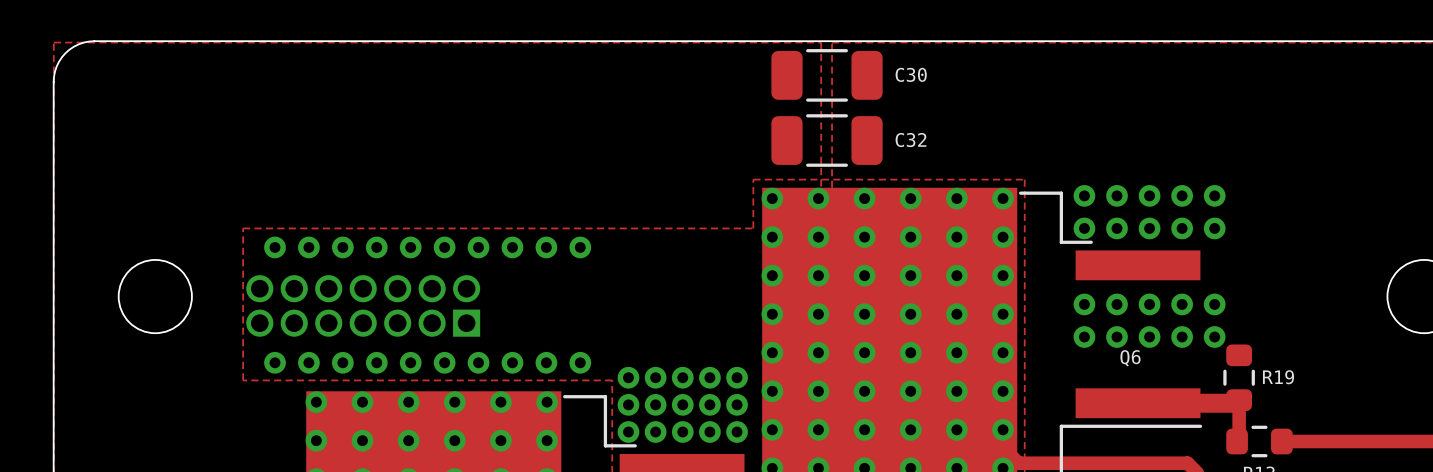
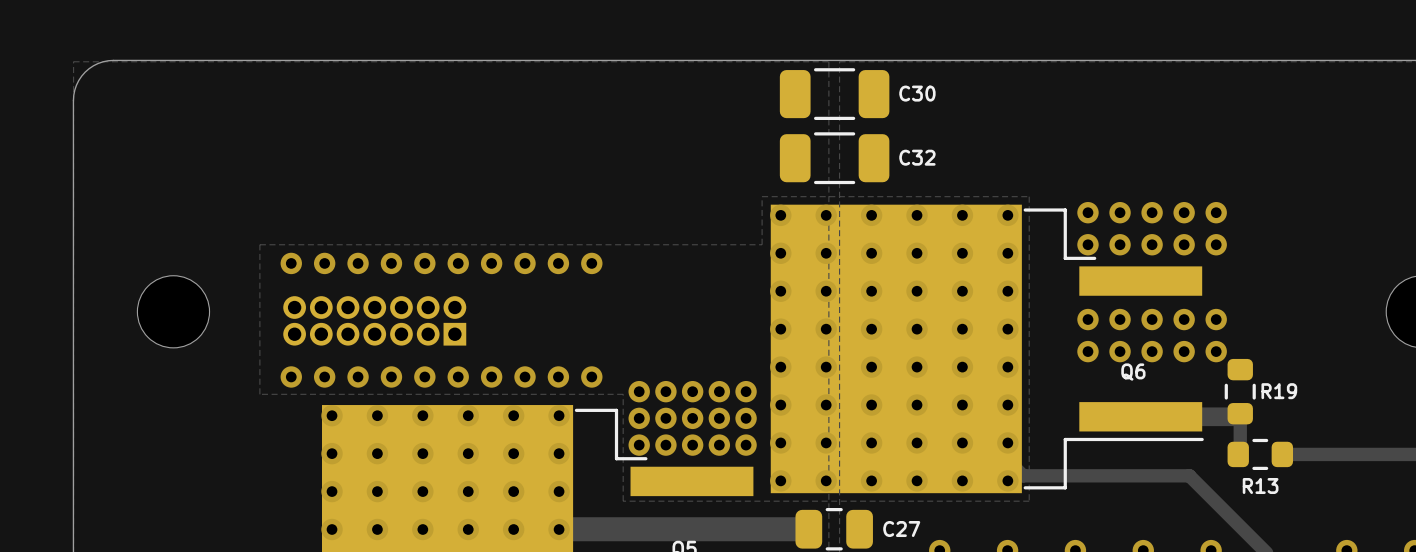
part footprint: [246, 275, 481, 337] -> [283, 296, 467, 346]

